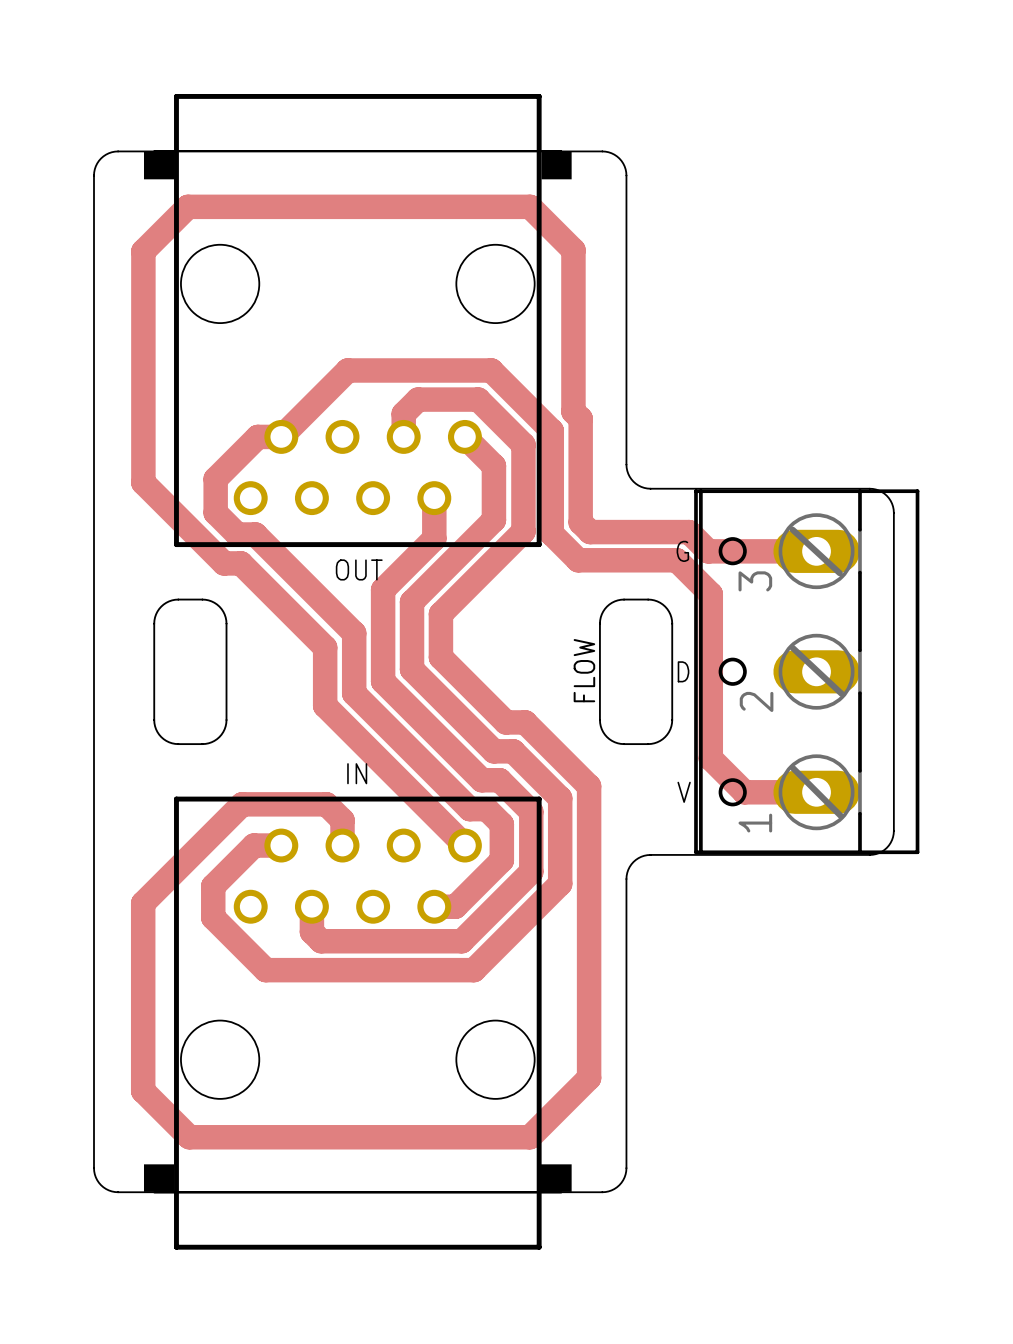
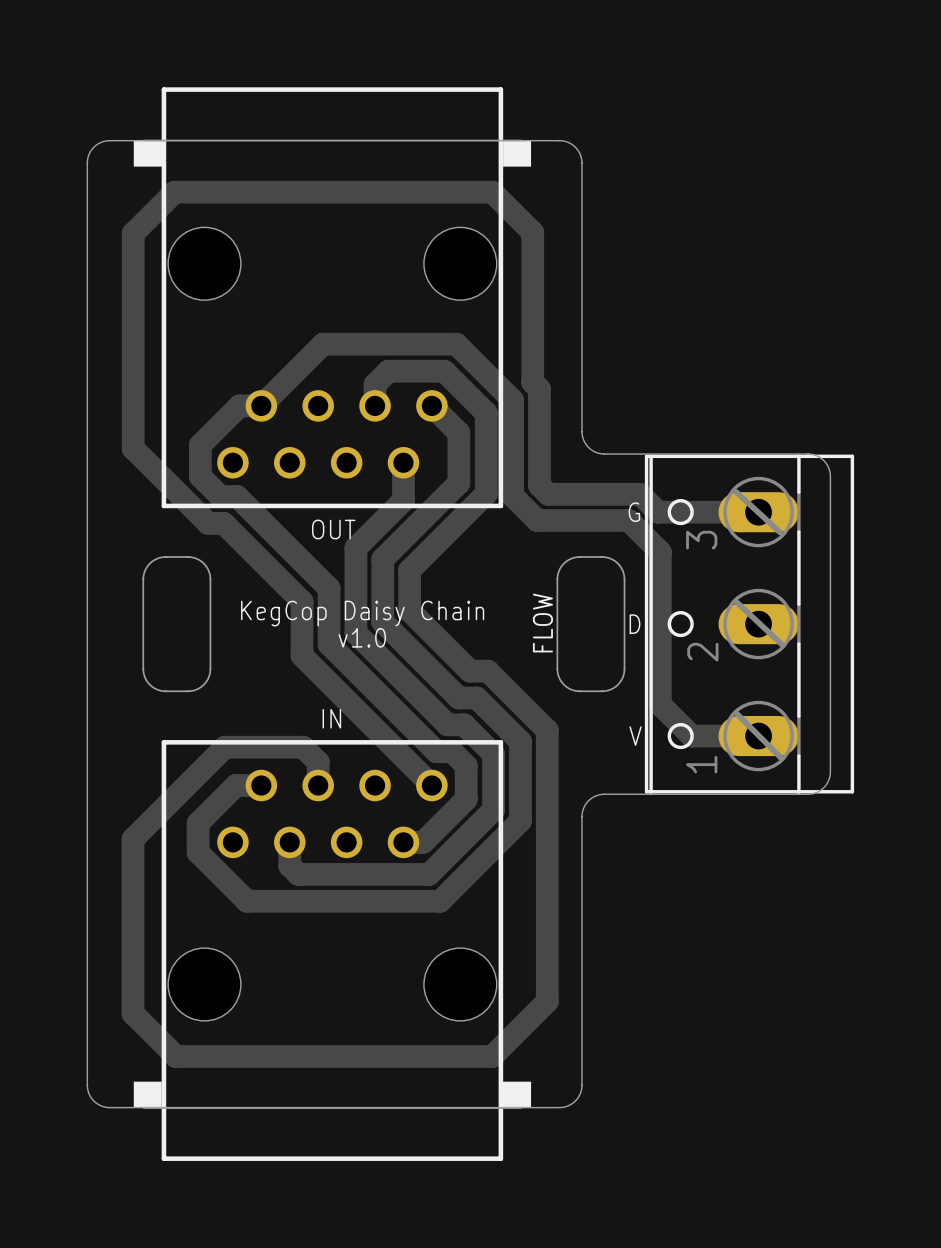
text: none -> KegCop Daisy Chain (362, 613)
text: none -> v1.0 (362, 637)

